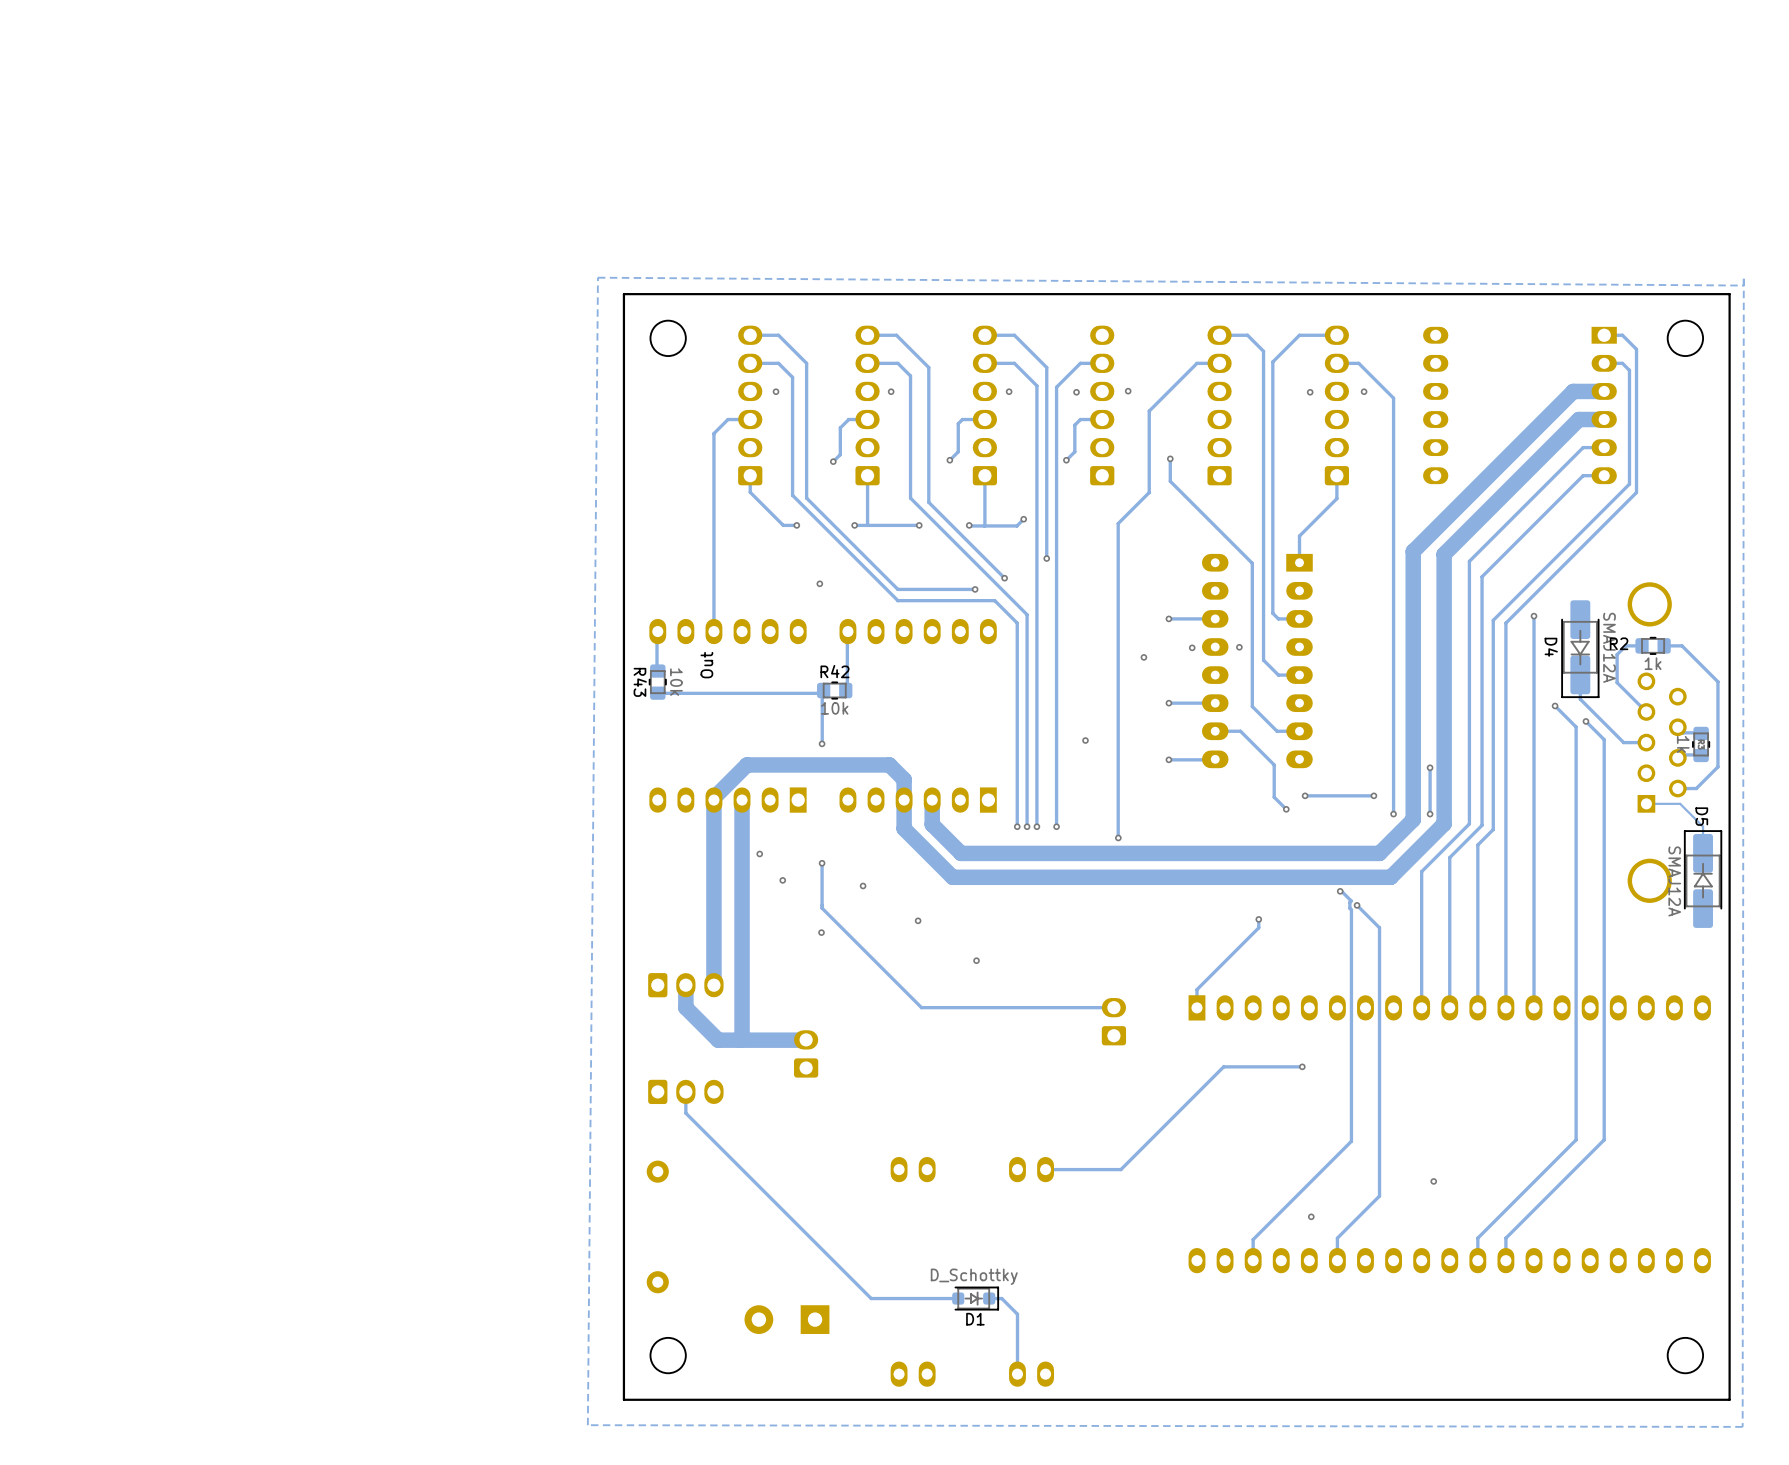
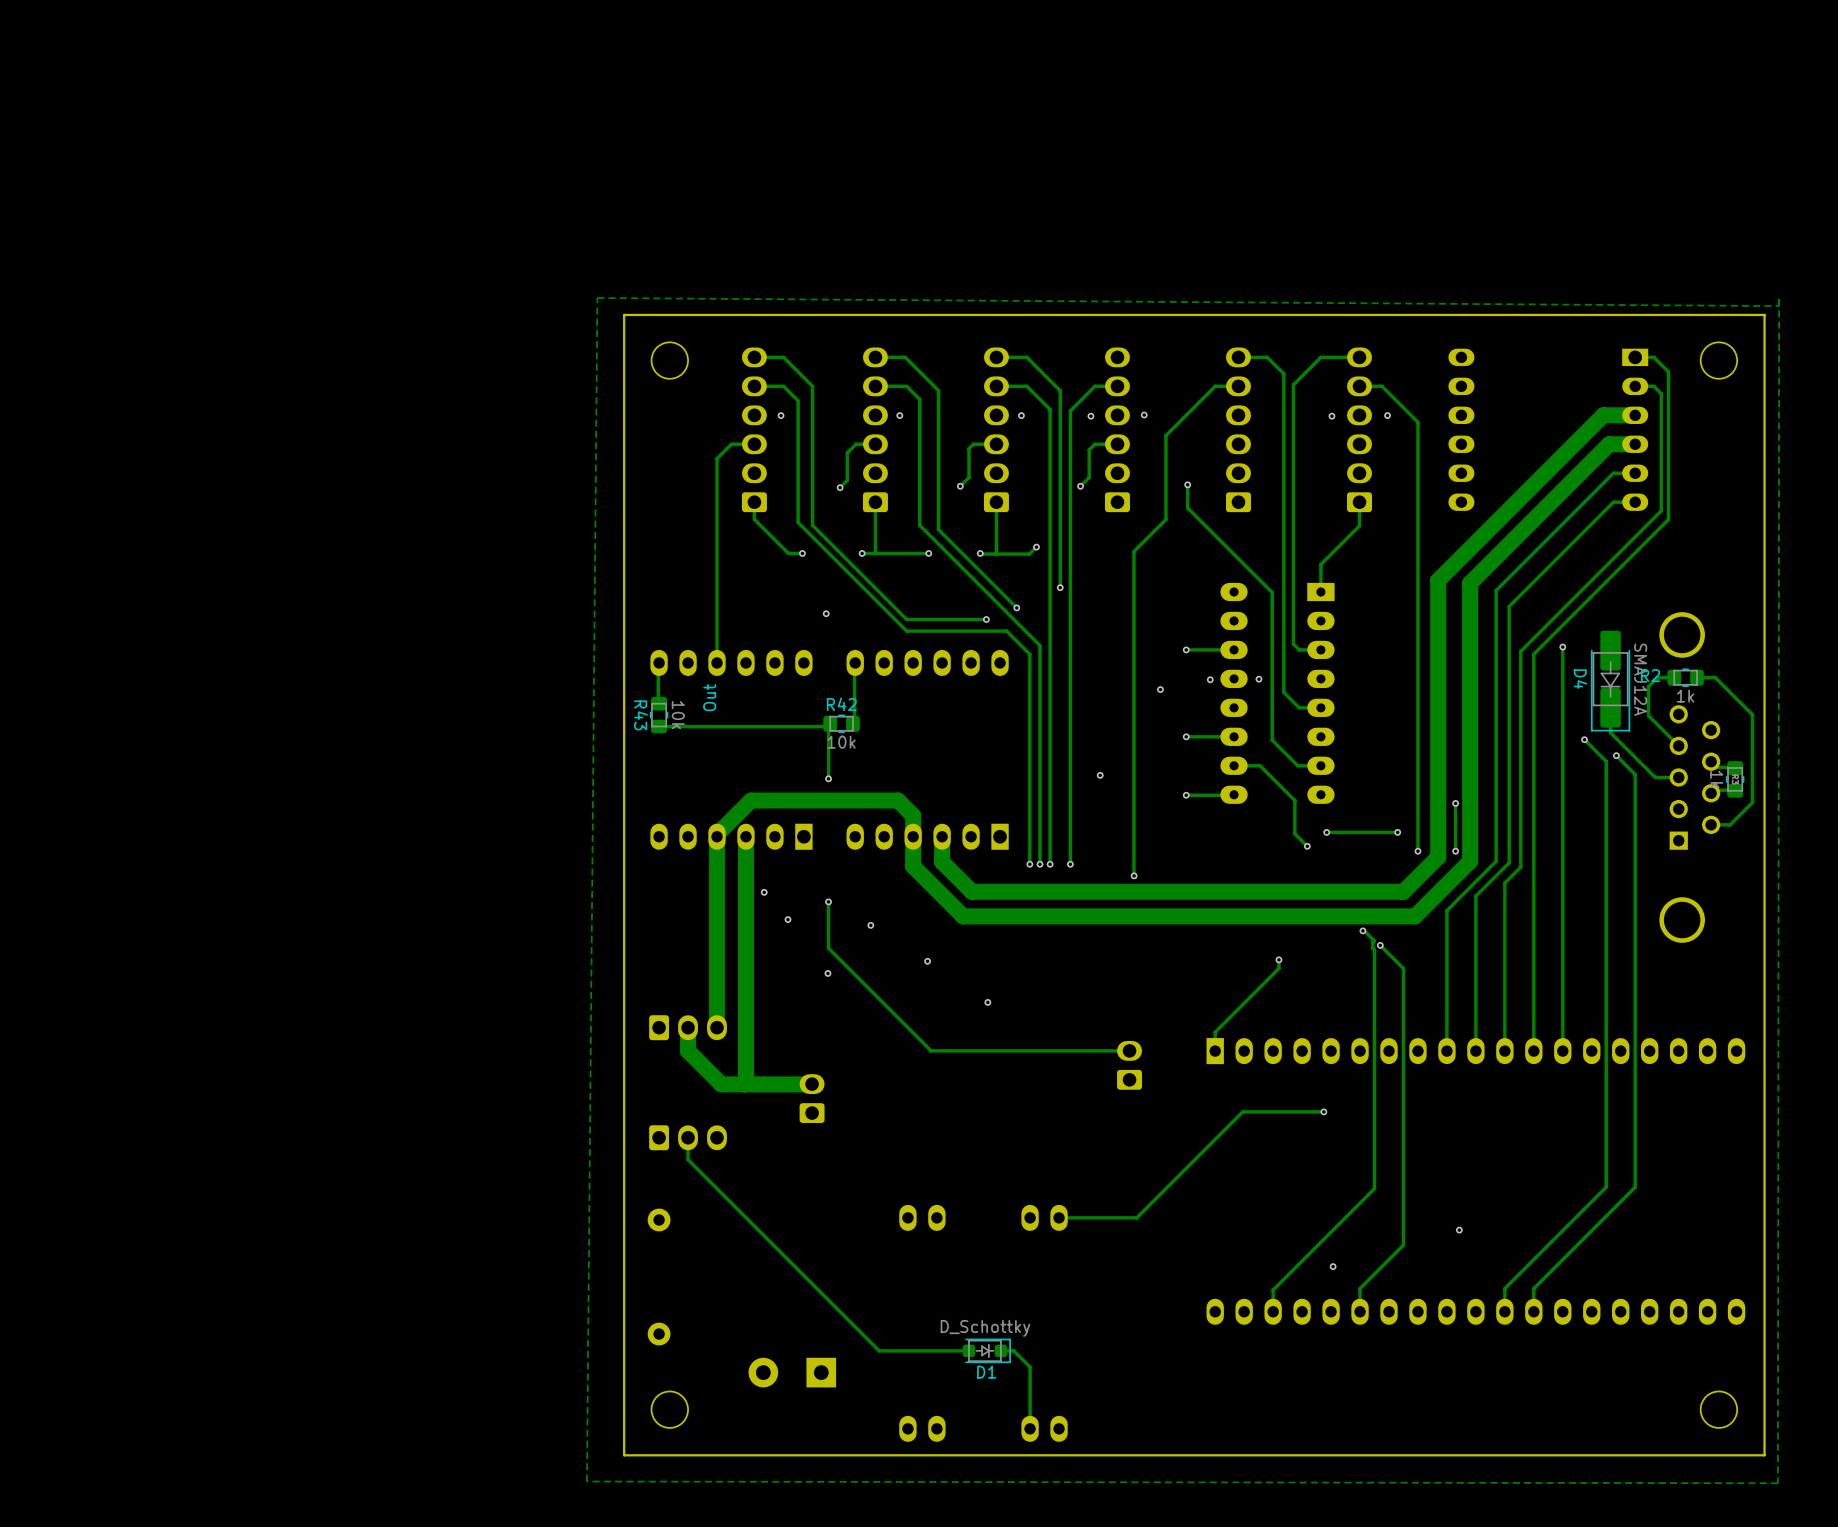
track: (1646, 803) (1680, 803) (1703, 826) (1703, 853) -> none
D5: SMAJ12A (1703, 879) -> none

